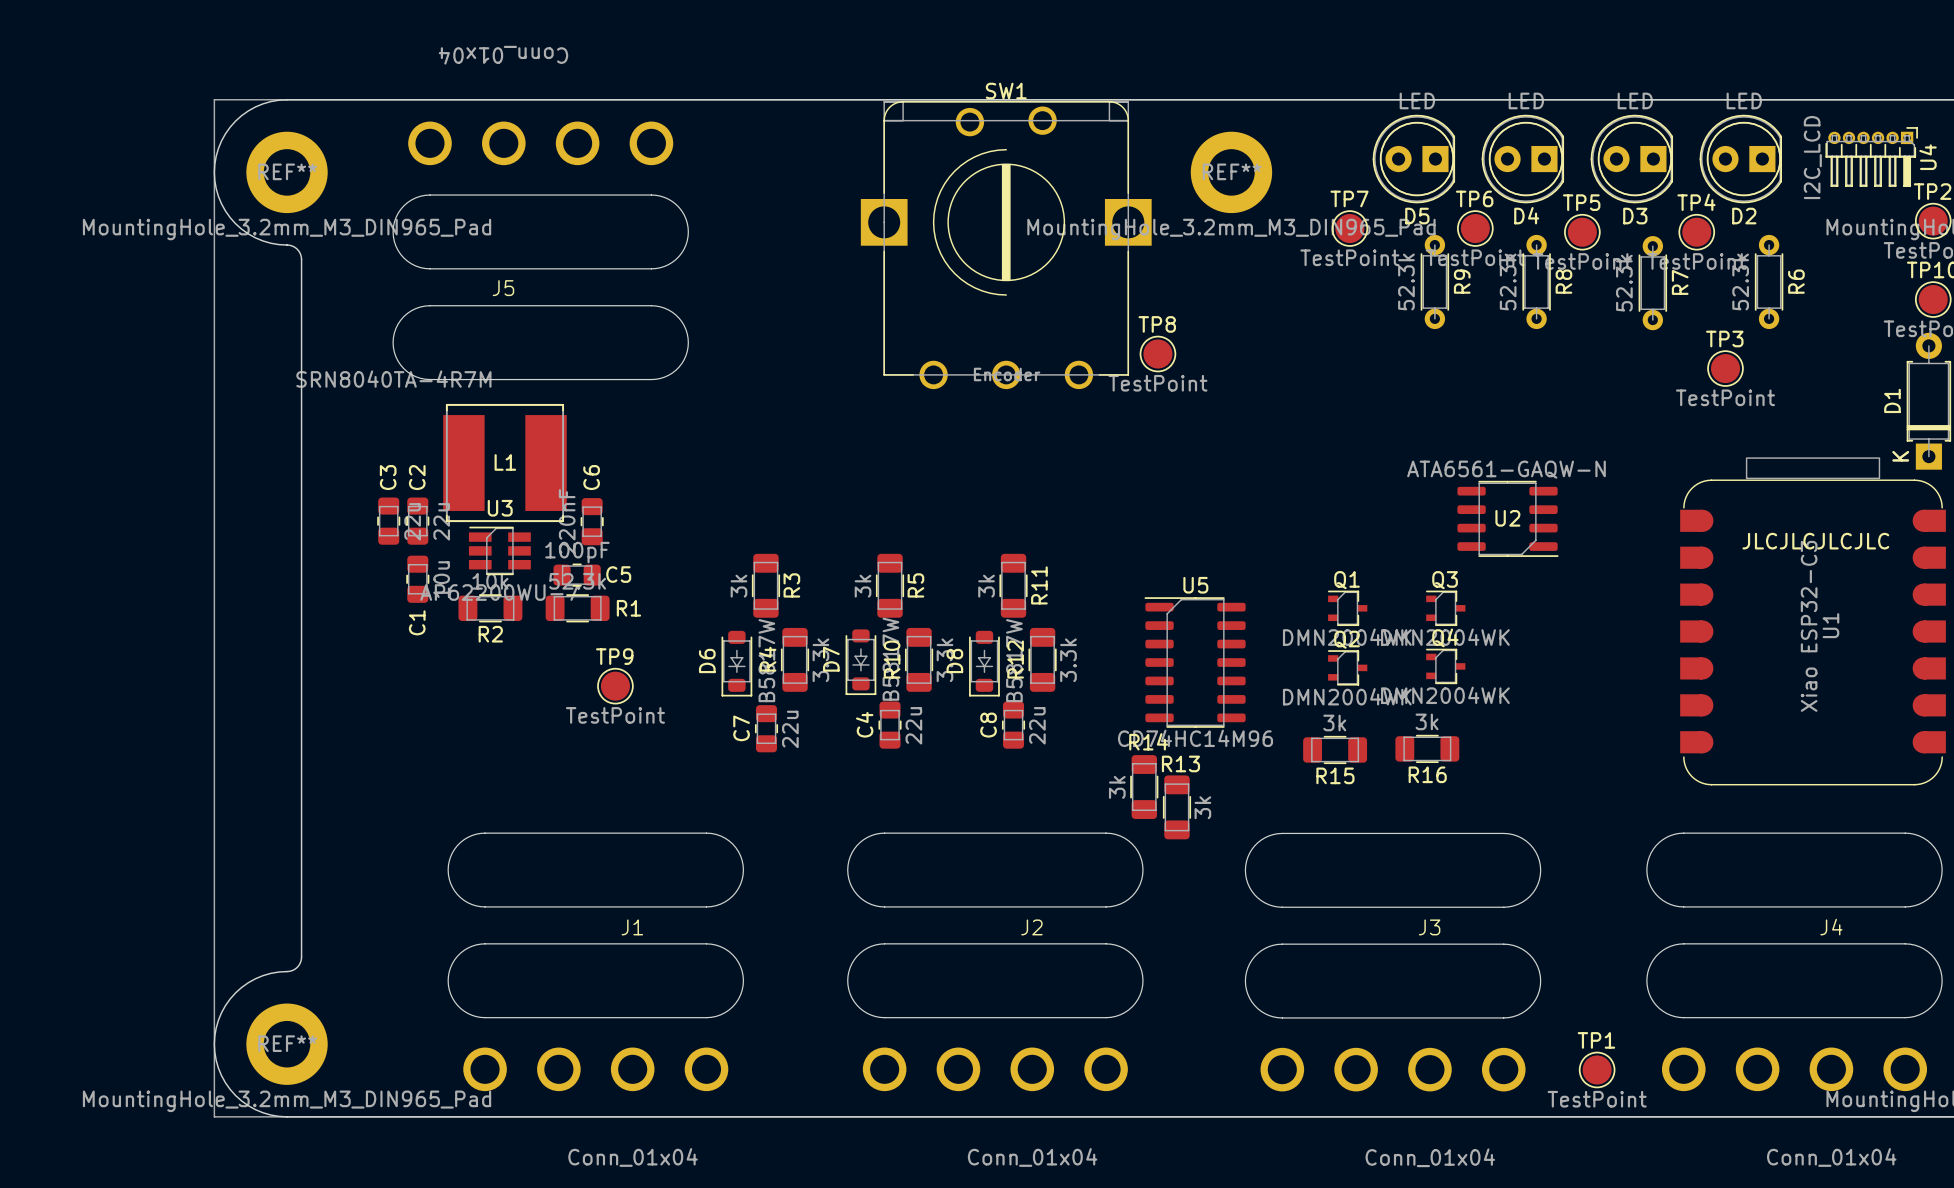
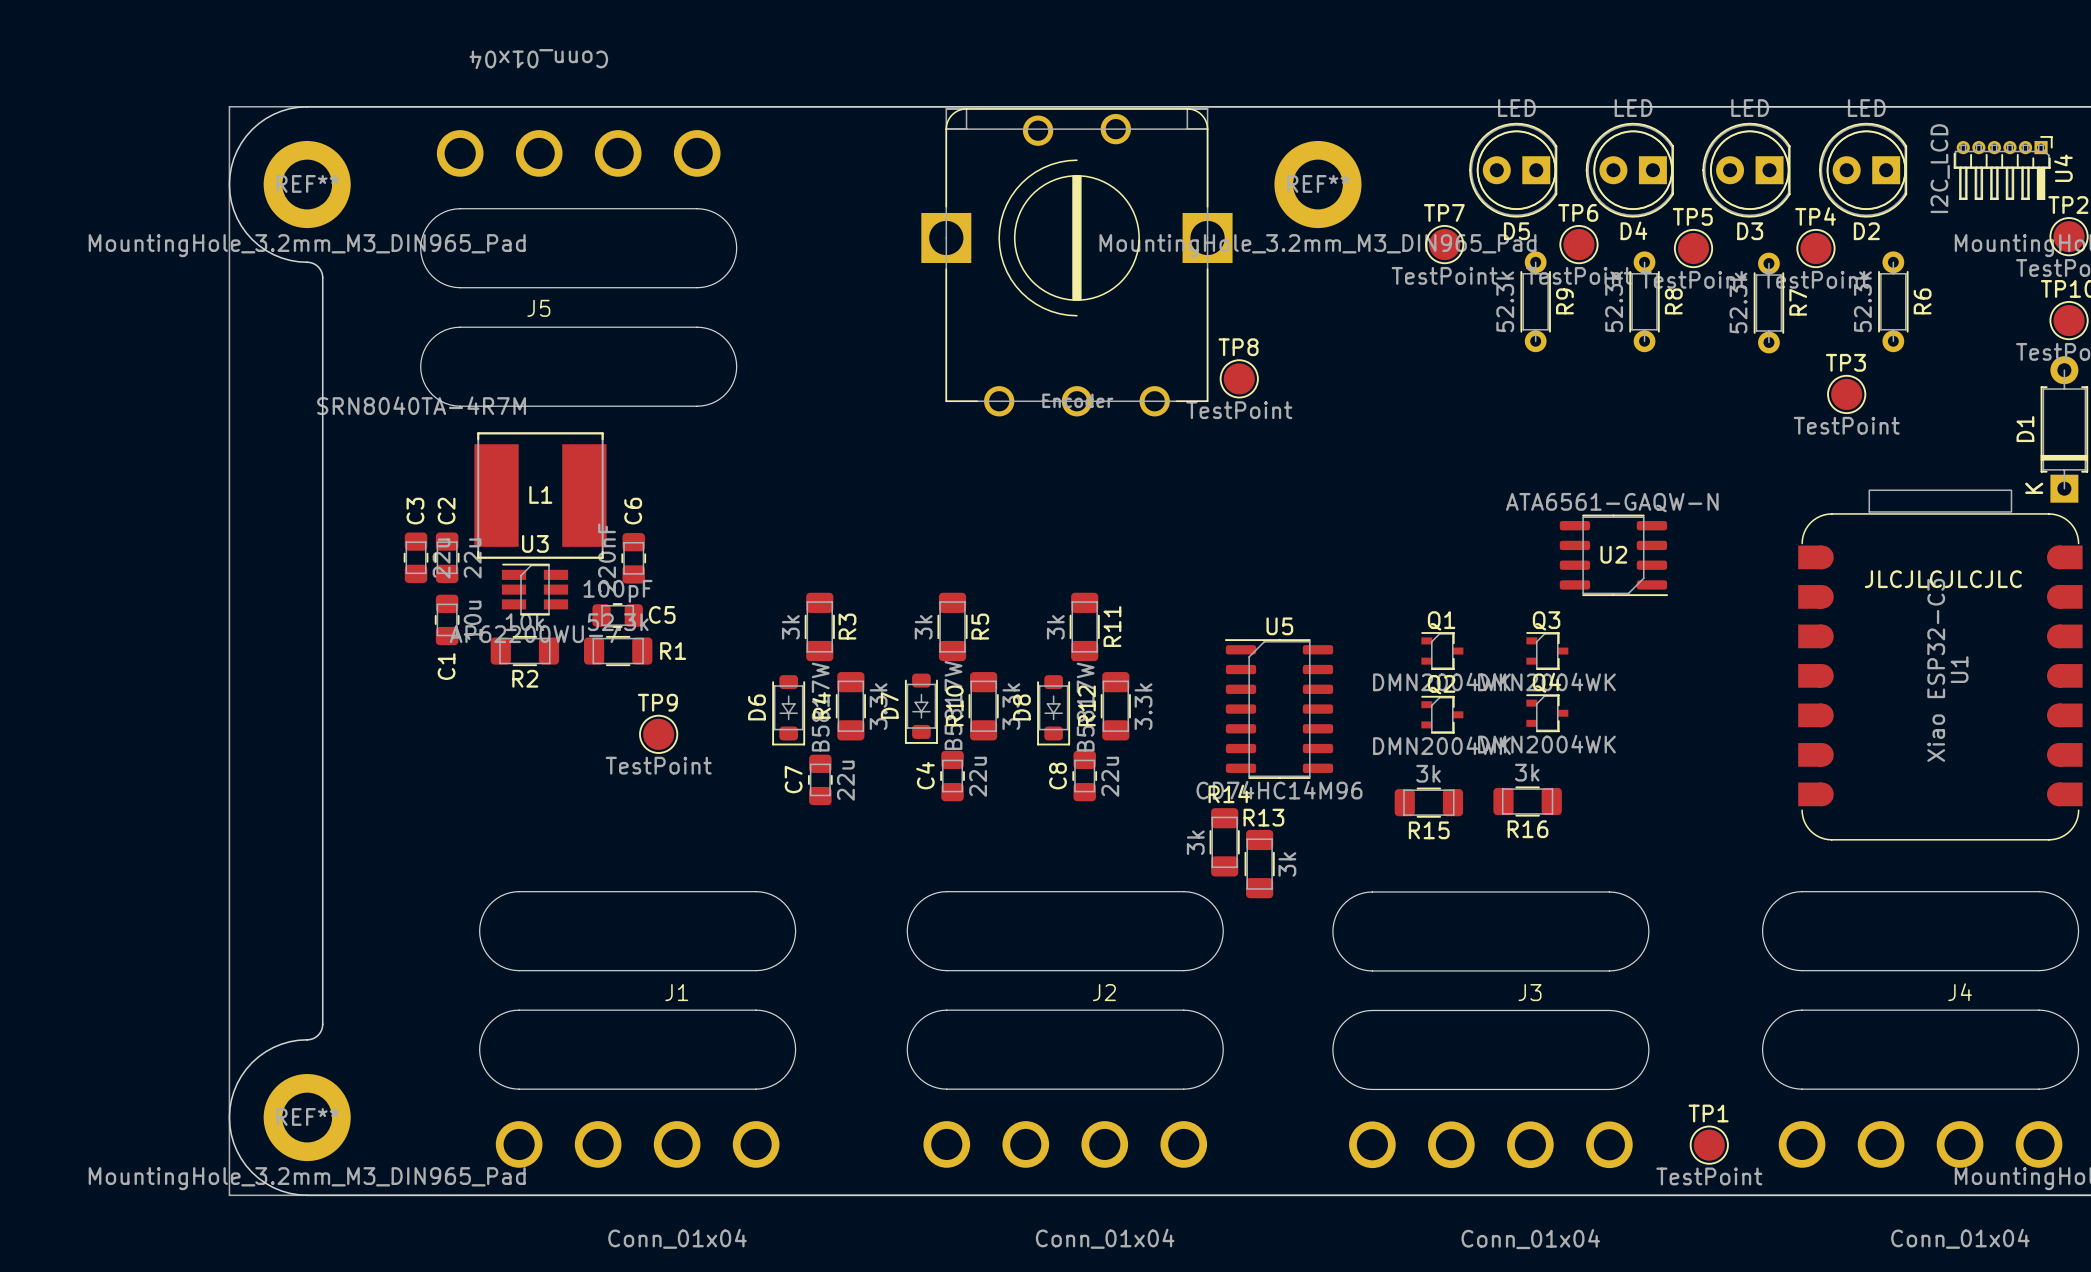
SW1 name: SW1 (1006, 91) -> none

